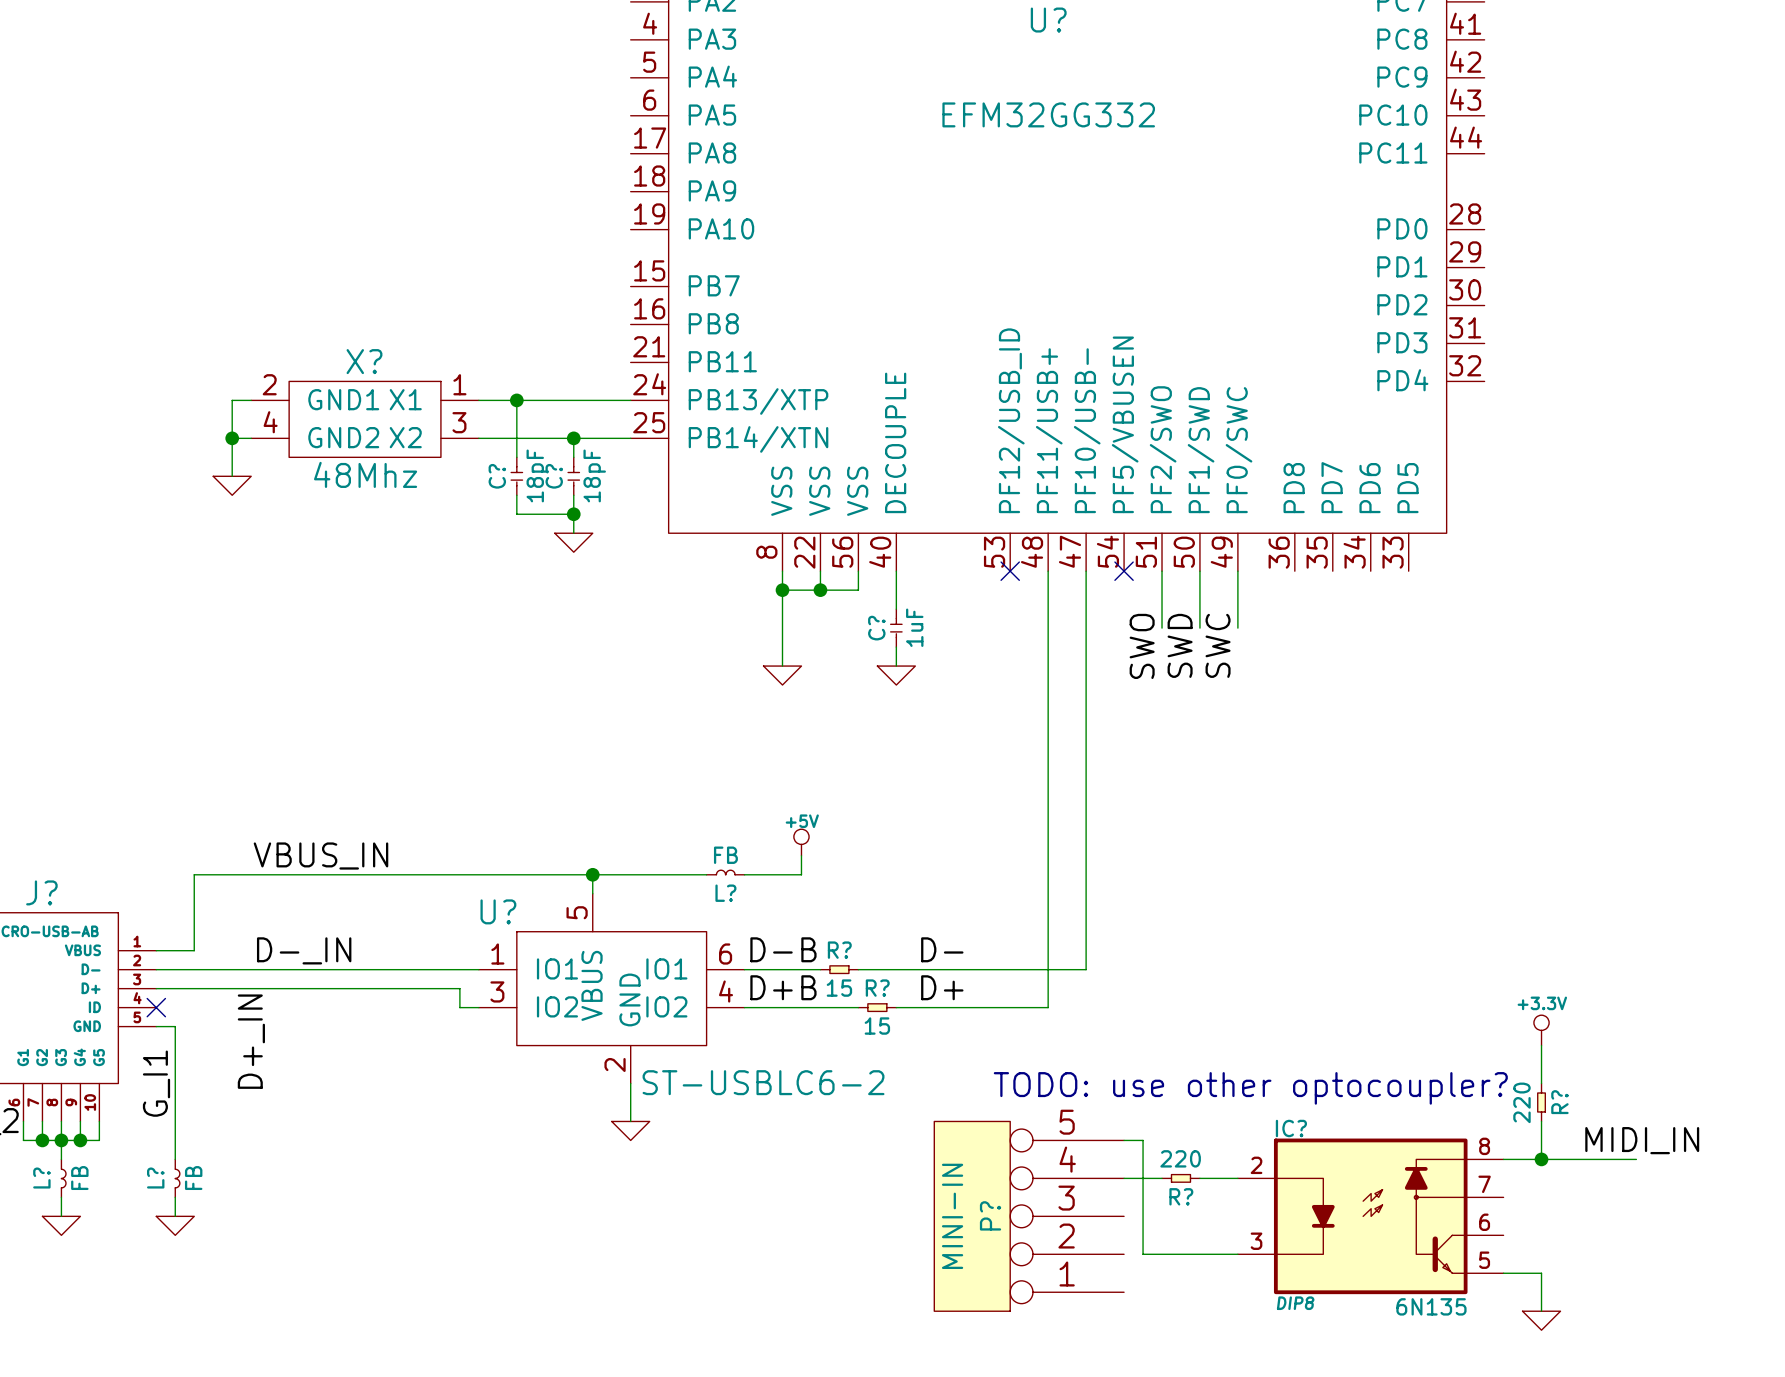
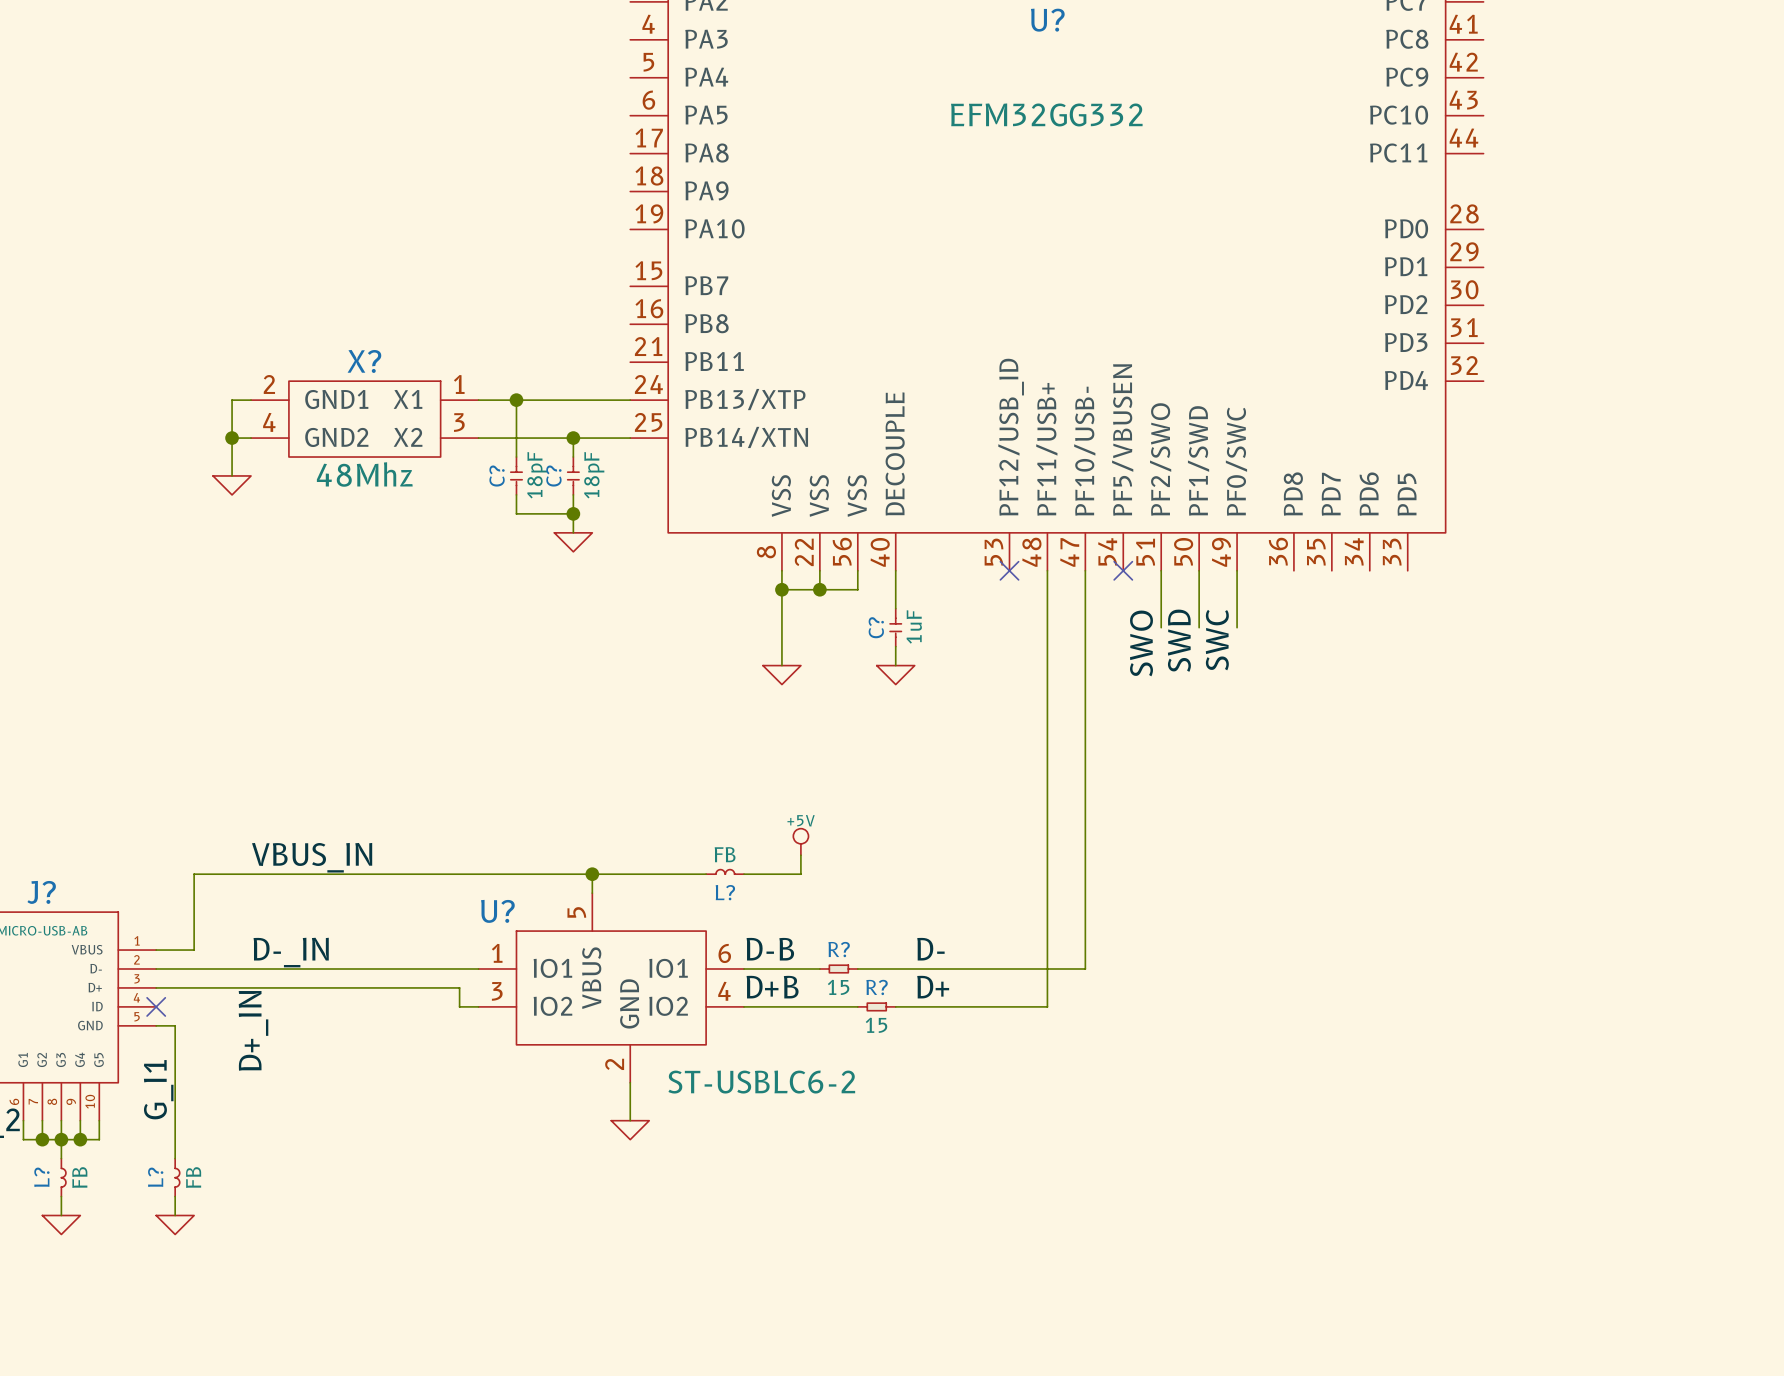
power symbol: +3.3V (1541, 1030) -> none
wire: (1541, 1045) (1541, 1083) -> none
text: TODO: use other optocoupler? (1250, 1088) -> none
R?: 220 (1541, 1102) -> none
wire: (1541, 1121) (1541, 1159) -> none
wire: (1124, 1140) (1143, 1140) (1143, 1254) (1237, 1254) -> none
label: MIDI_IN (1642, 1140) -> none
wire: (1503, 1159) (1636, 1159) -> none
junction: (1541, 1159) -> none
wire: (1124, 1178) (1162, 1178) -> none
R?: 220 (1180, 1178) -> none
wire: (1199, 1178) (1237, 1178) -> none
P?: MINI-IN (1029, 1216) -> none
IC?: 6N135 (1370, 1216) -> none
wire: (1503, 1273) (1541, 1273) (1541, 1311) -> none
power symbol: (1541, 1320) -> none

